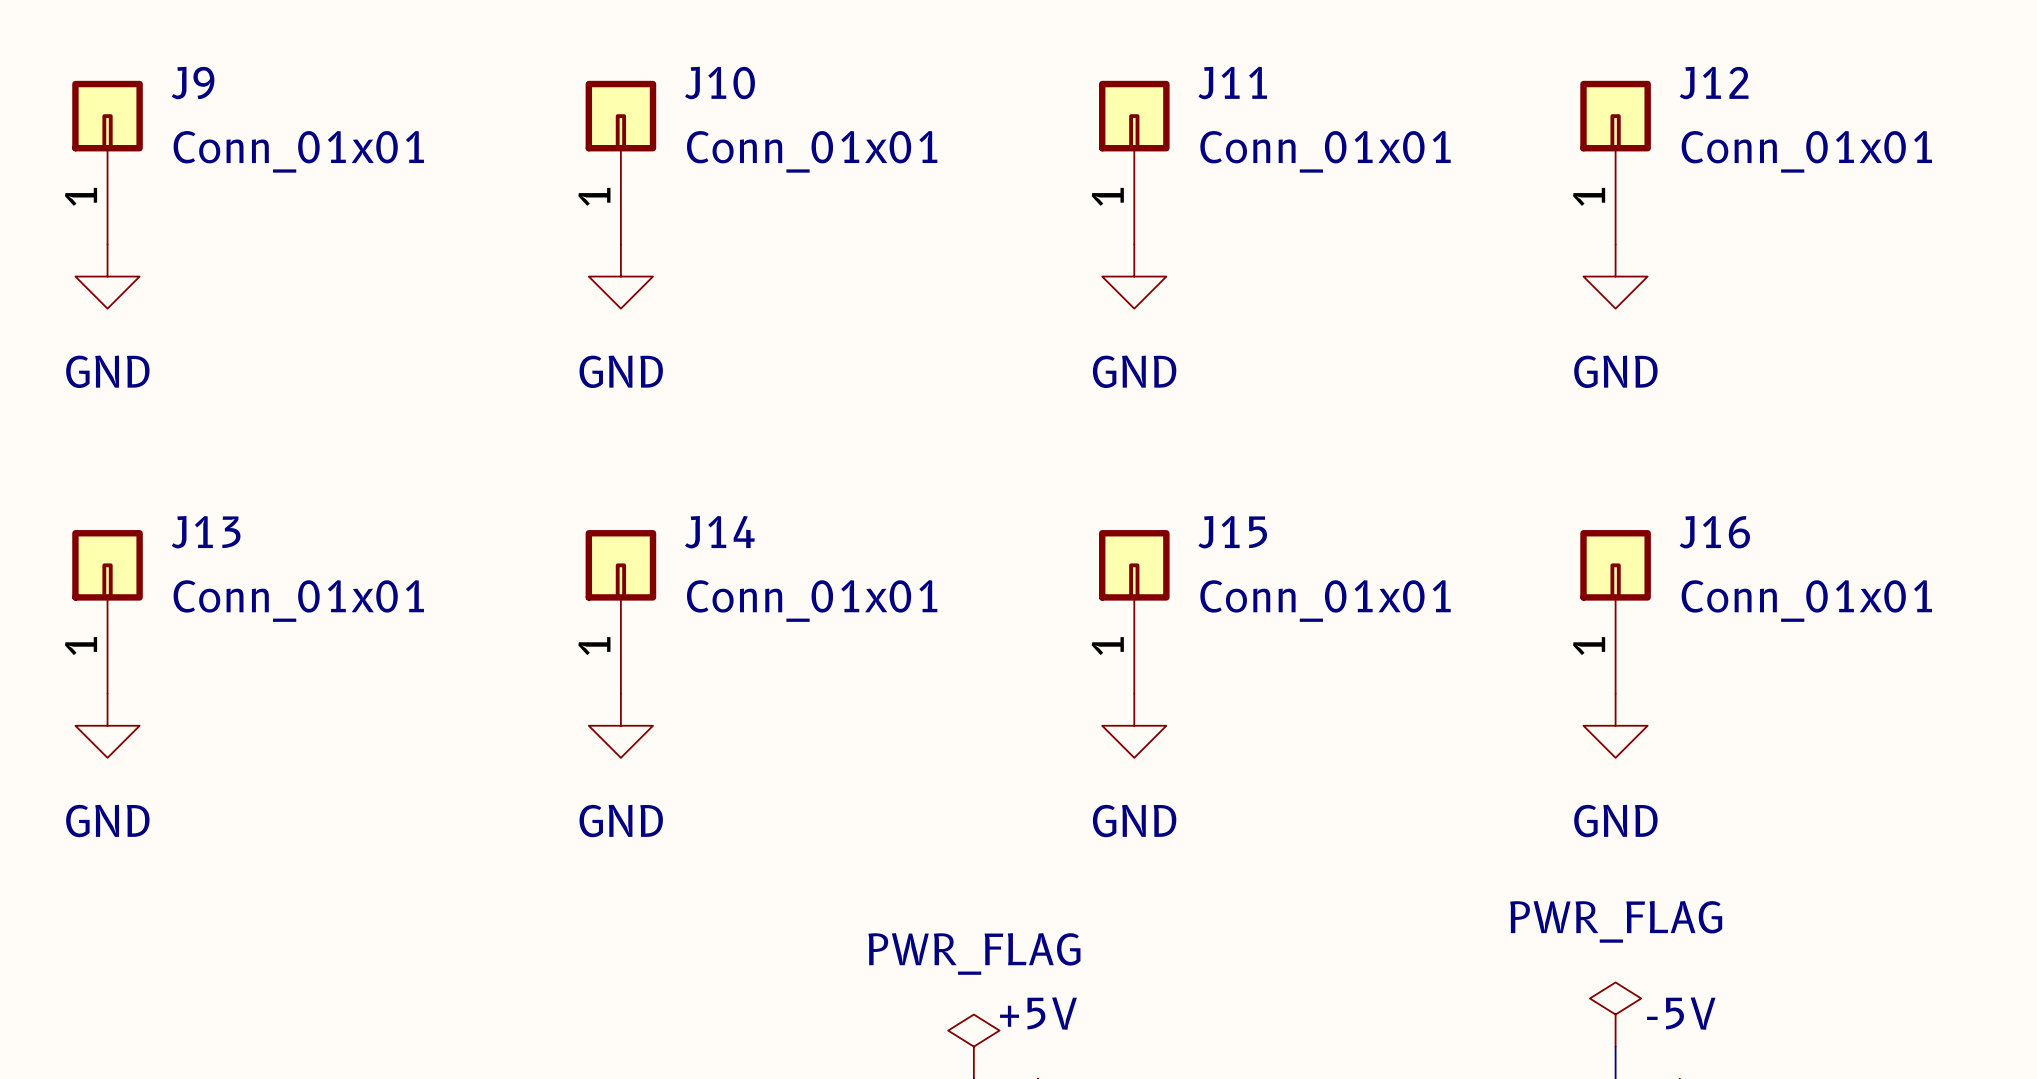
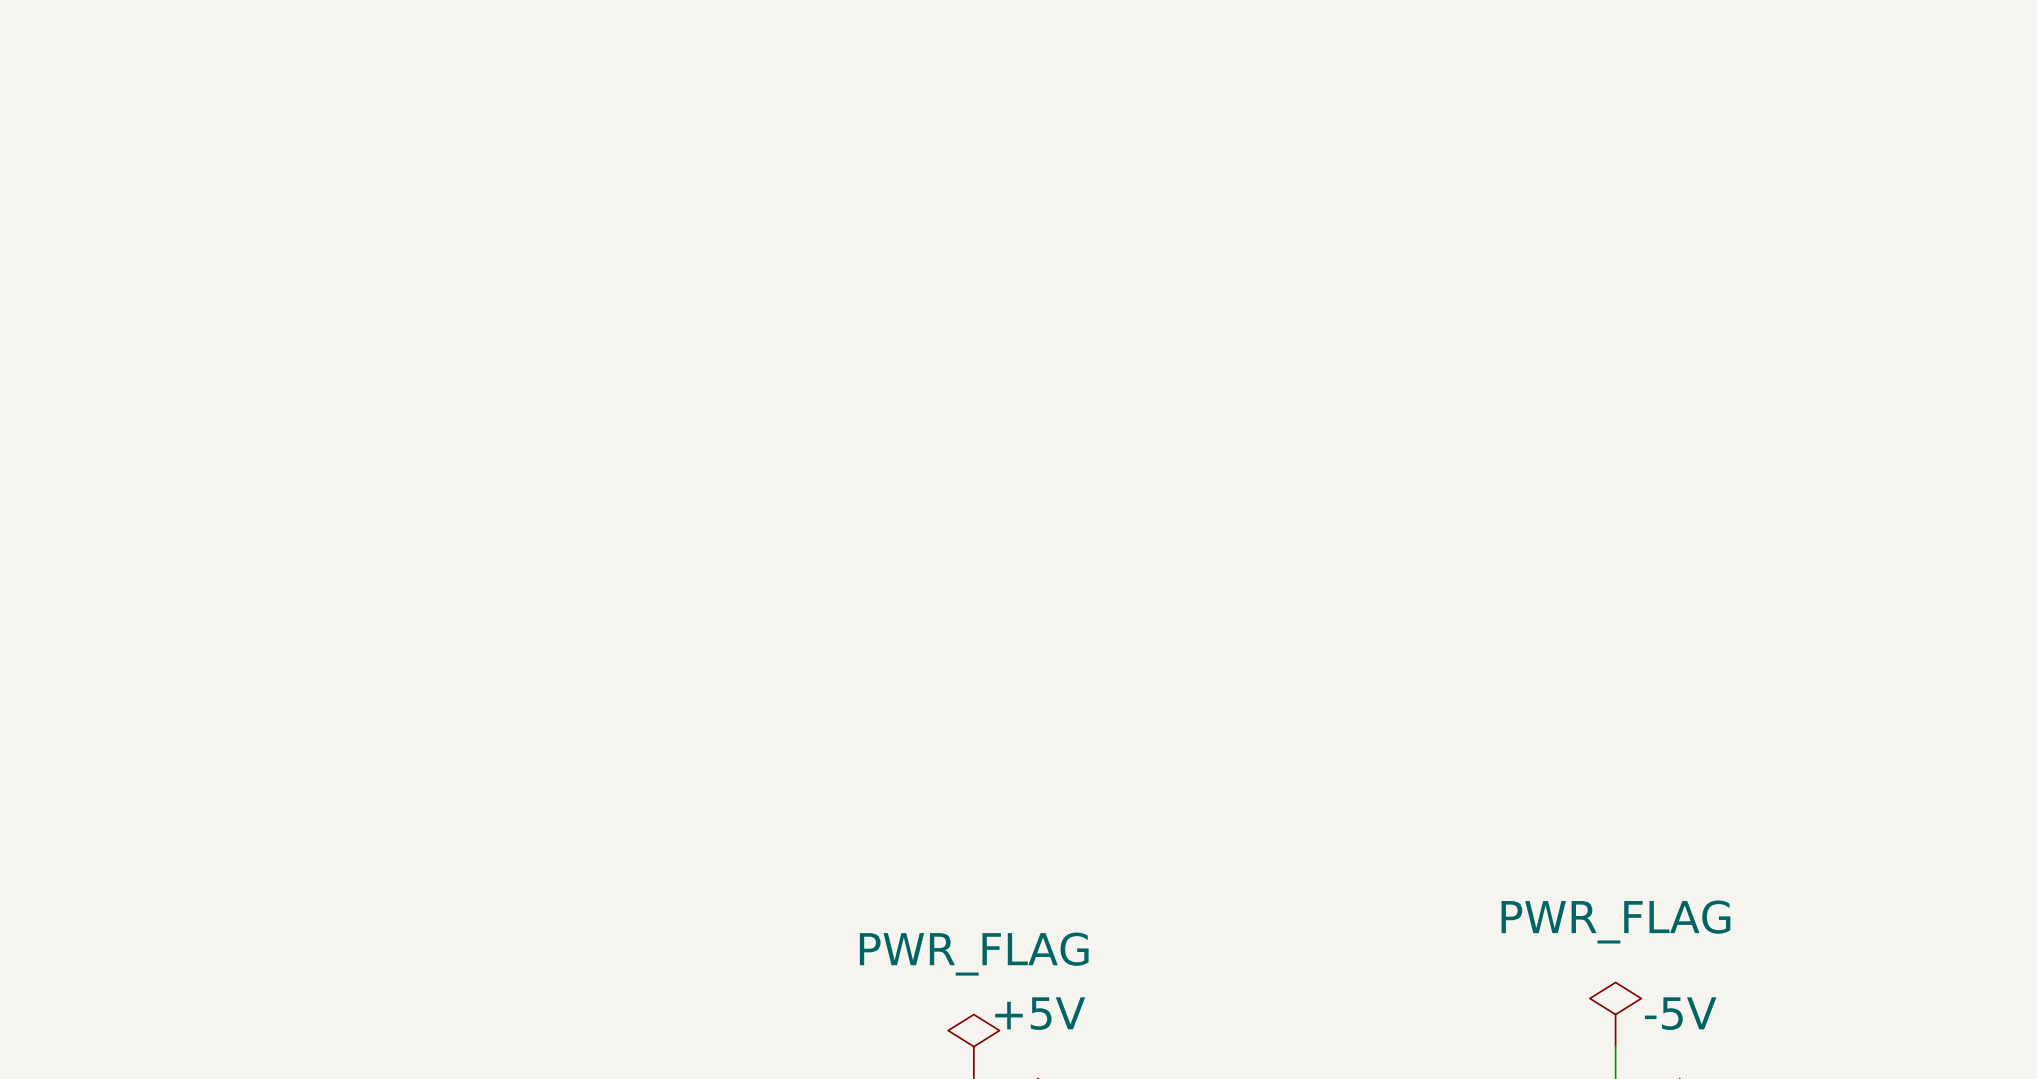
J9: Conn_01x01 (107, 162) -> none
J10: Conn_01x01 (620, 162) -> none
J11: Conn_01x01 (1134, 162) -> none
J12: Conn_01x01 (1615, 162) -> none
power symbol: GND (107, 276) -> none
power symbol: GND (620, 276) -> none
power symbol: GND (1134, 276) -> none
power symbol: GND (1615, 276) -> none
J13: Conn_01x01 (107, 611) -> none
J14: Conn_01x01 (620, 611) -> none
J15: Conn_01x01 (1134, 611) -> none
J16: Conn_01x01 (1615, 611) -> none
power symbol: GND (107, 725) -> none
power symbol: GND (620, 725) -> none
power symbol: GND (1134, 725) -> none
power symbol: GND (1615, 725) -> none

